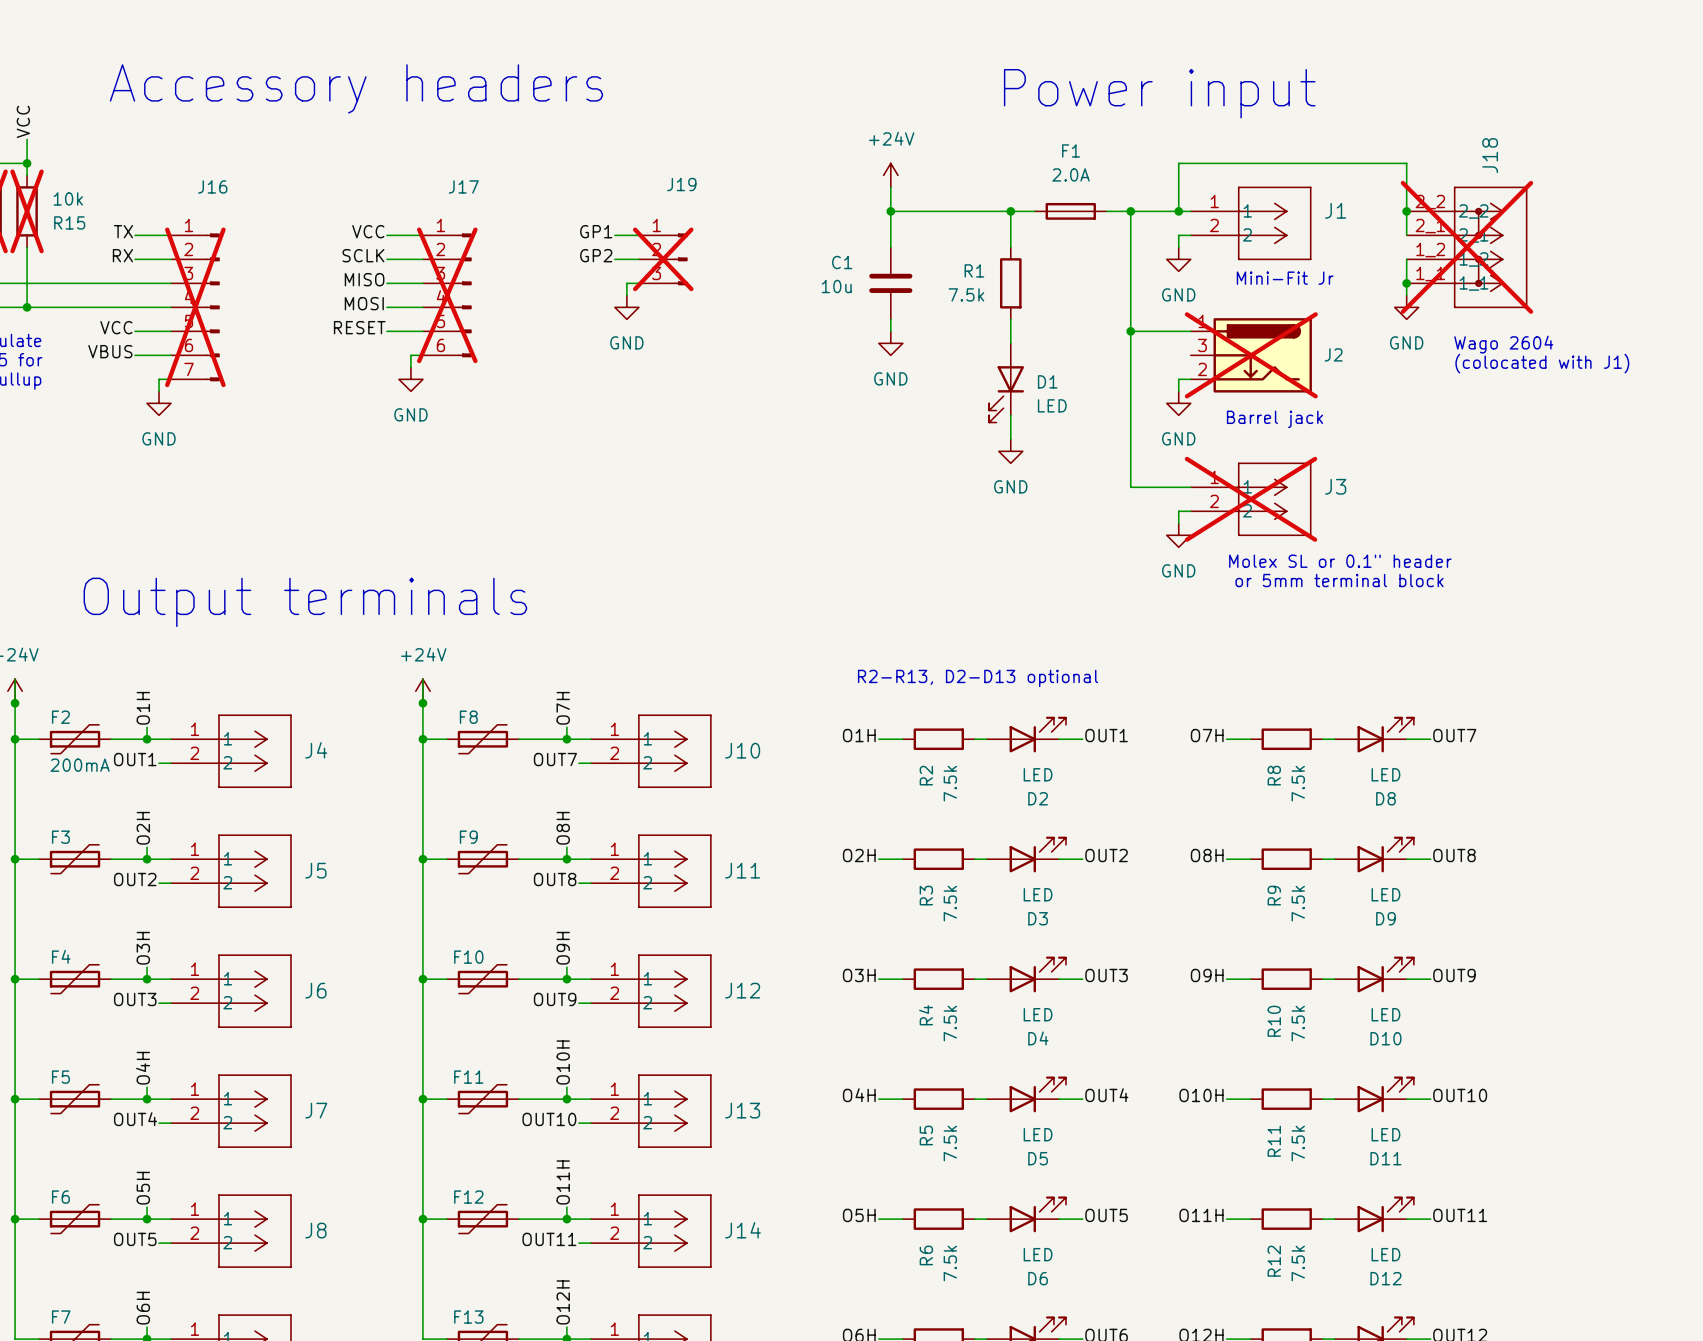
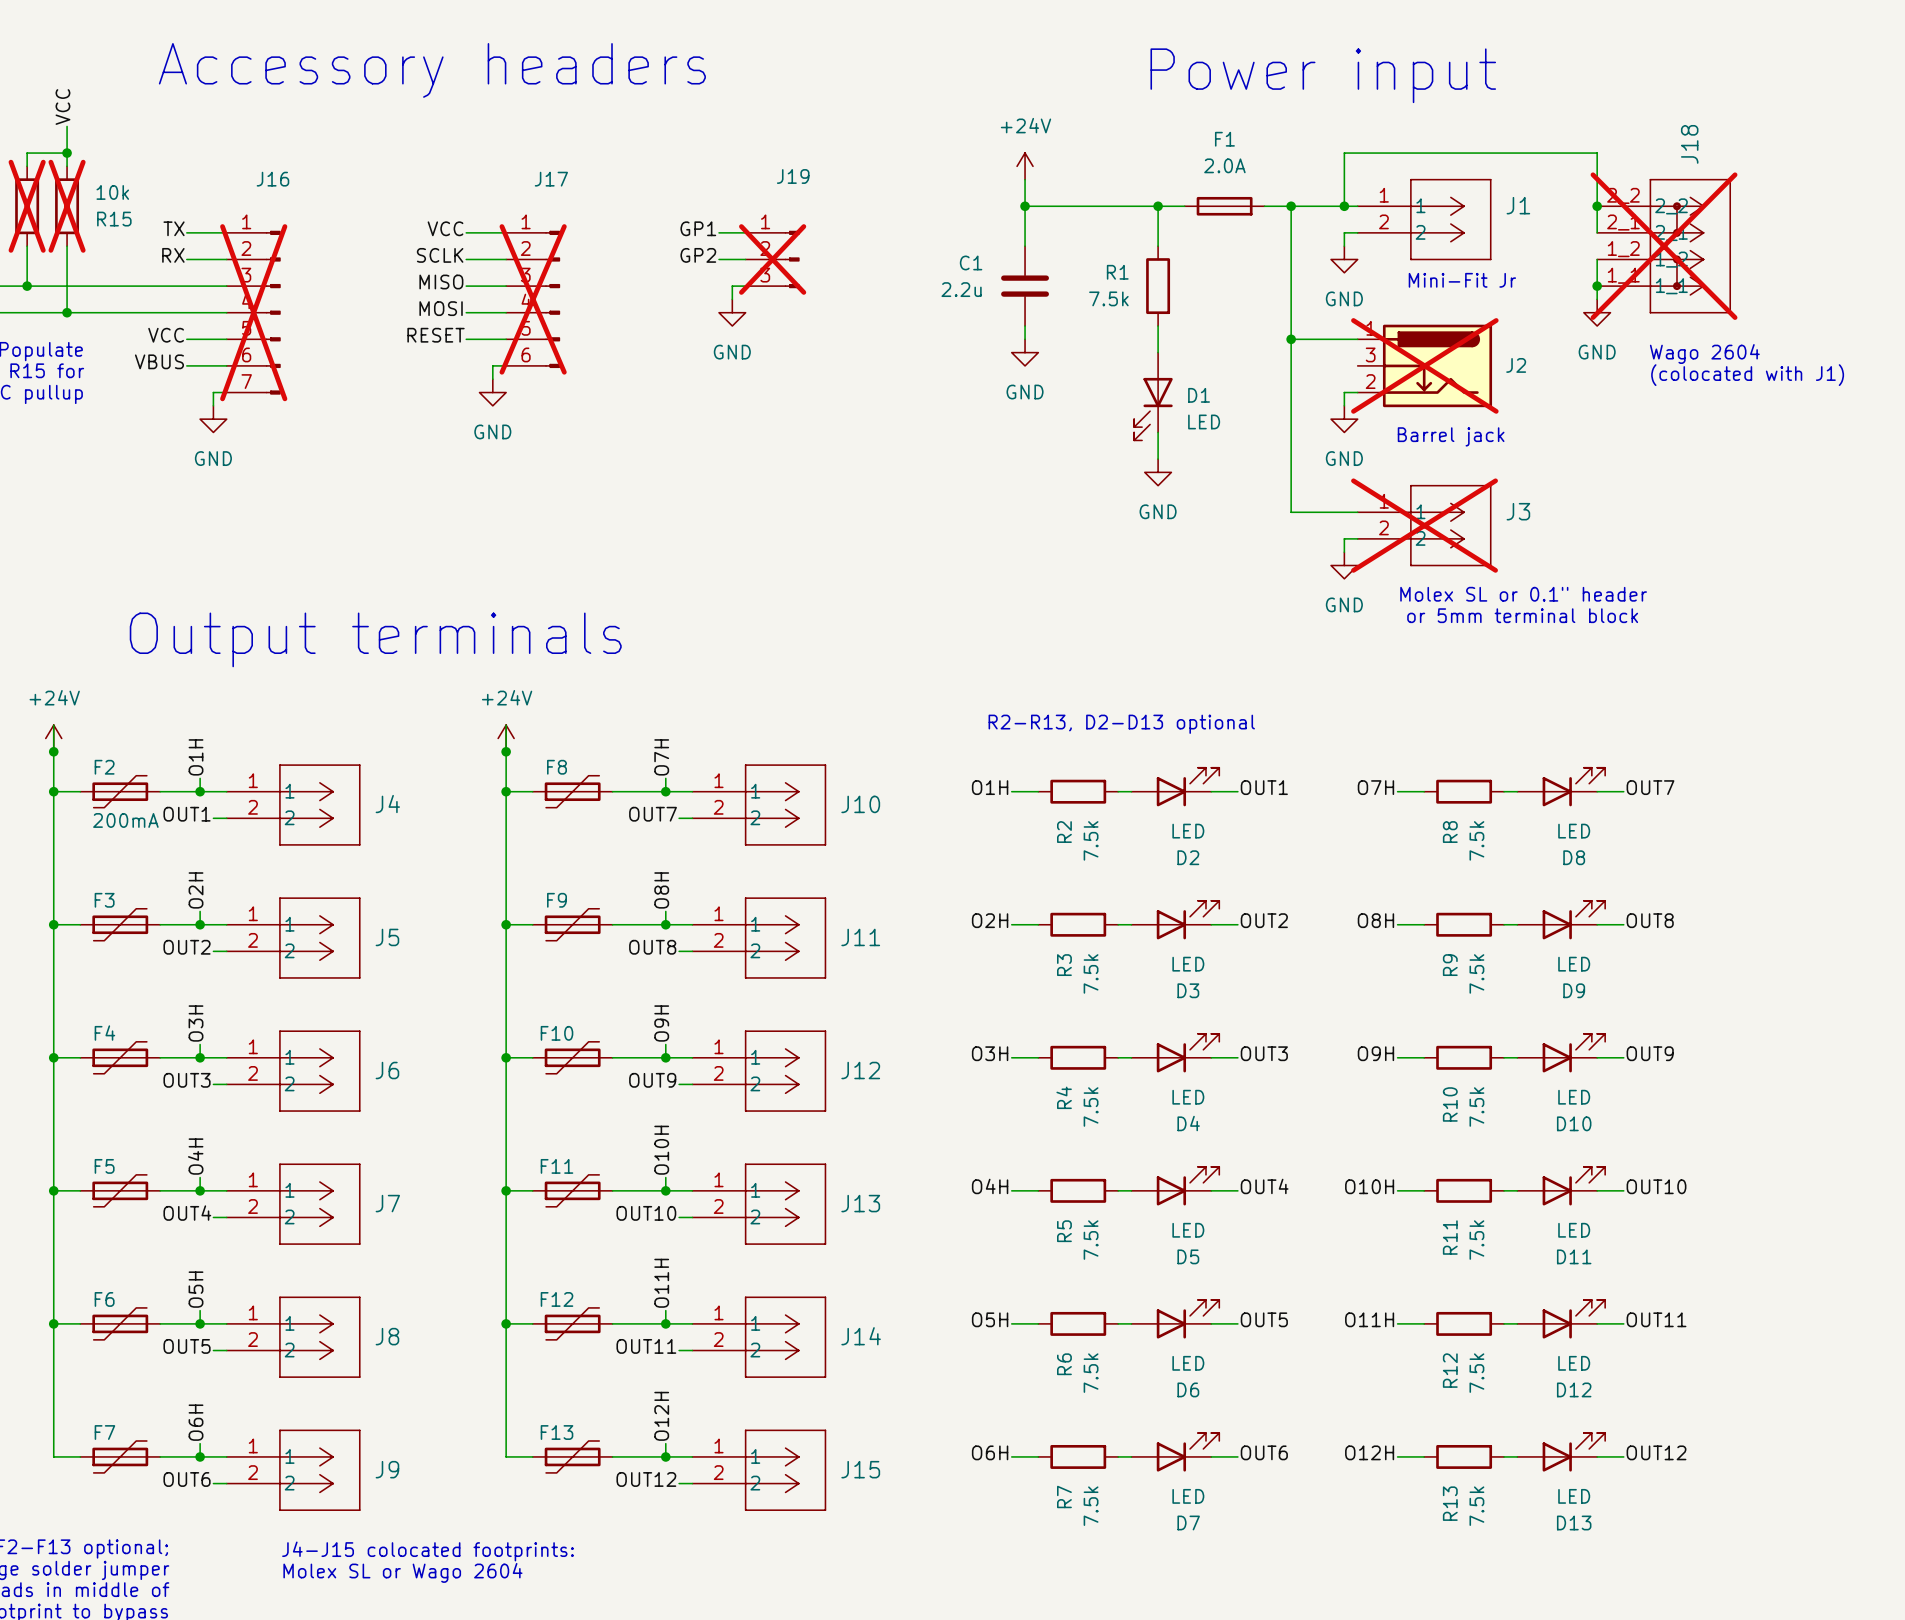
C1 value: 10u (836, 286) -> 2.2u (961, 289)

